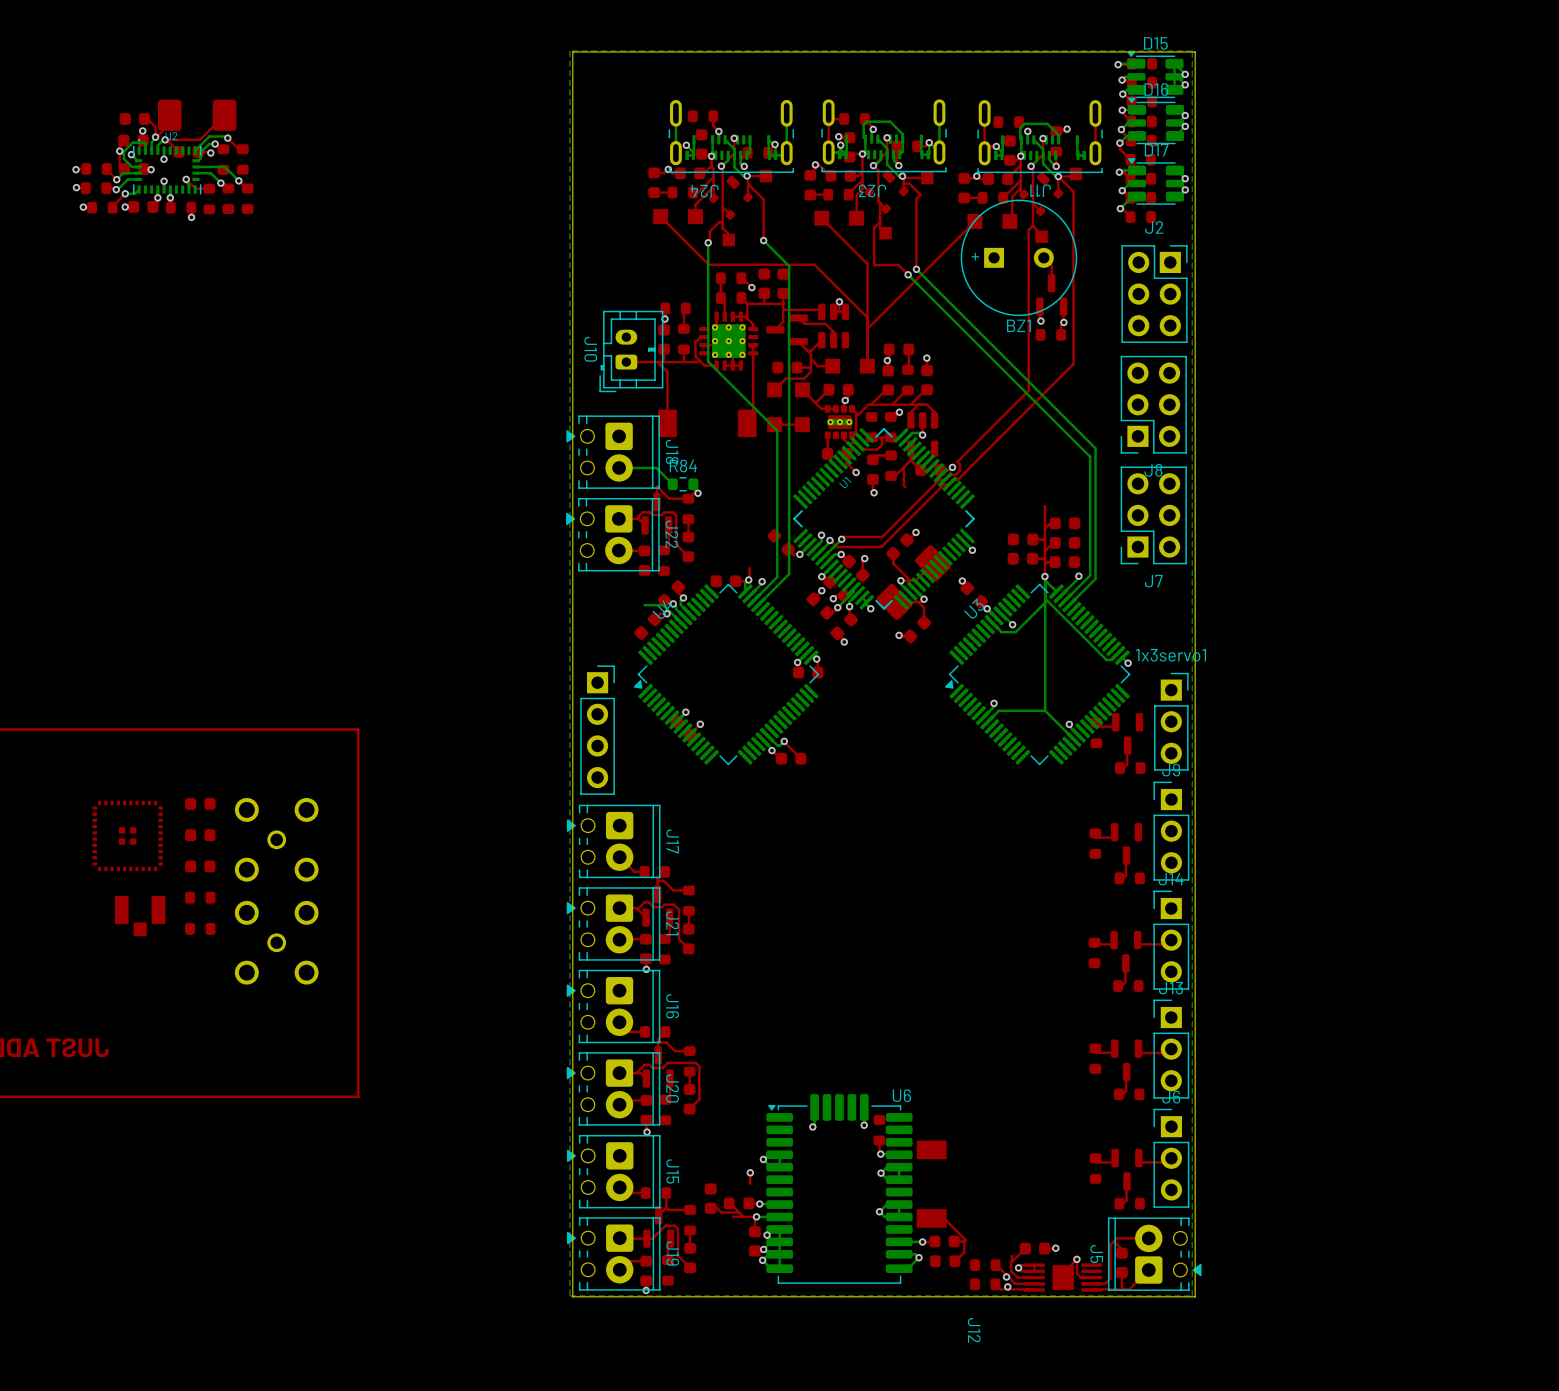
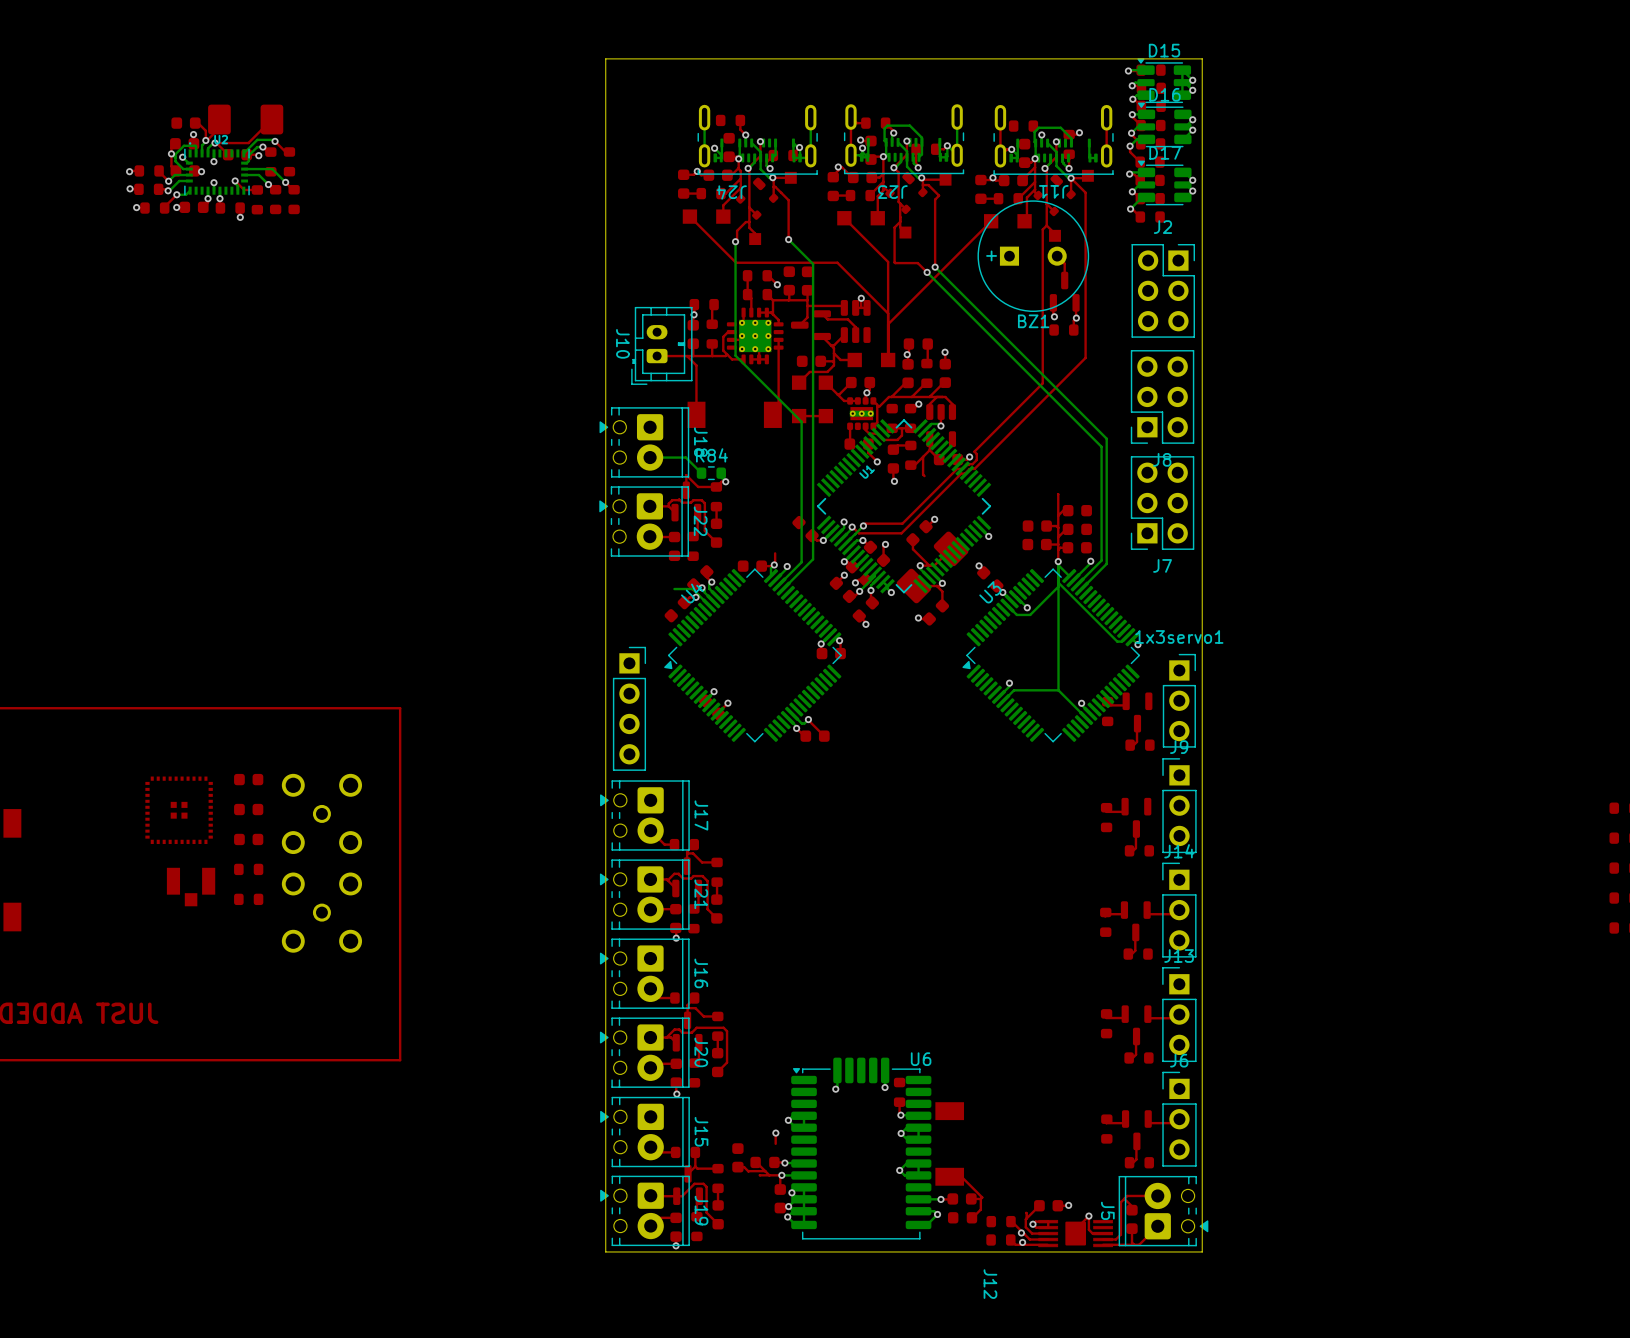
bottom zone outline: (1192, 51) (569, 51) (569, 1295) (1192, 1295) (1192, 51) -> none

